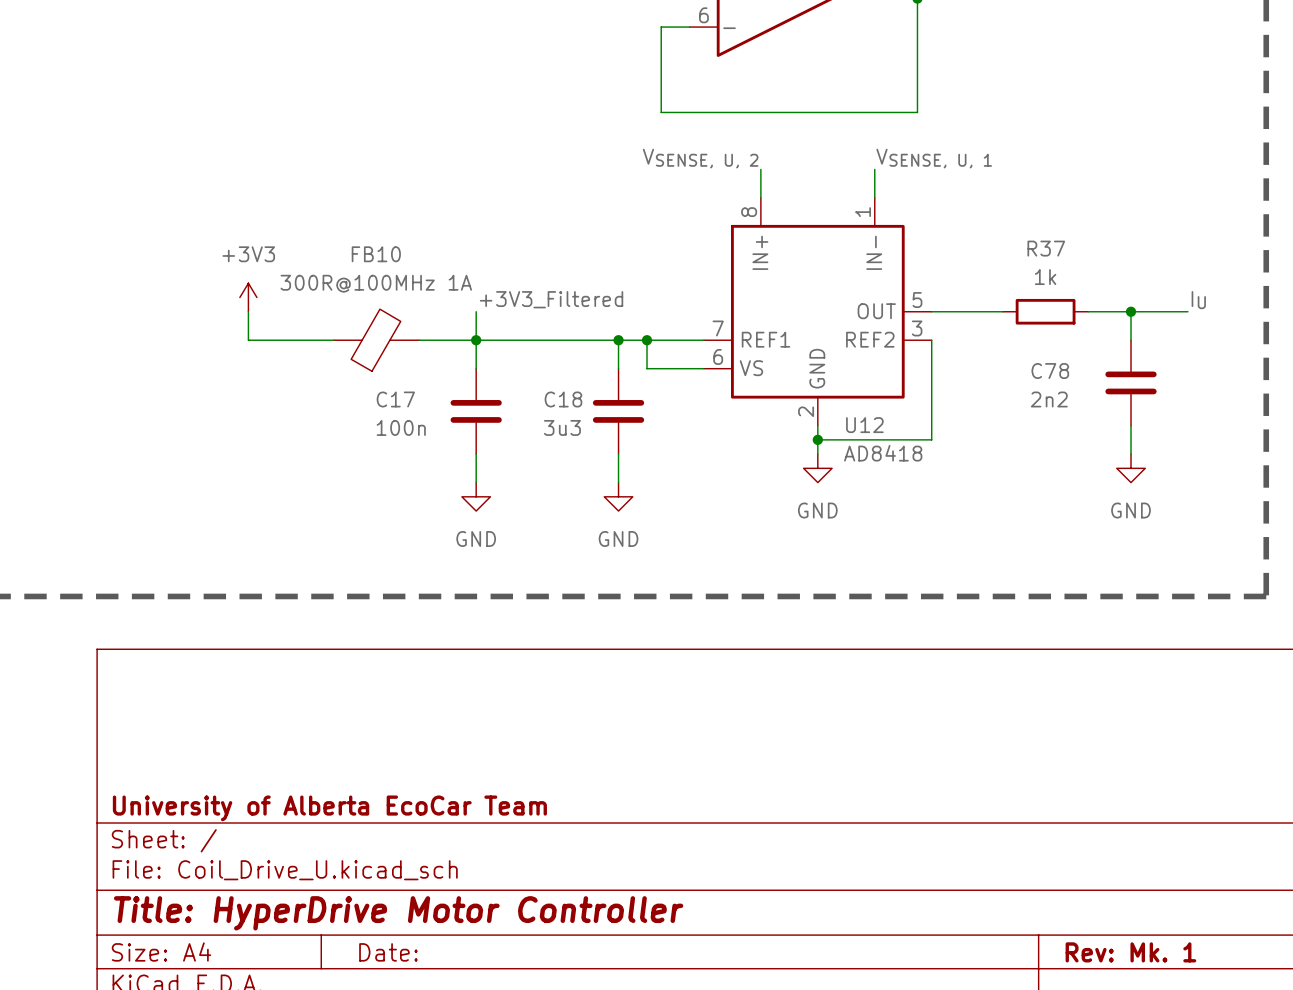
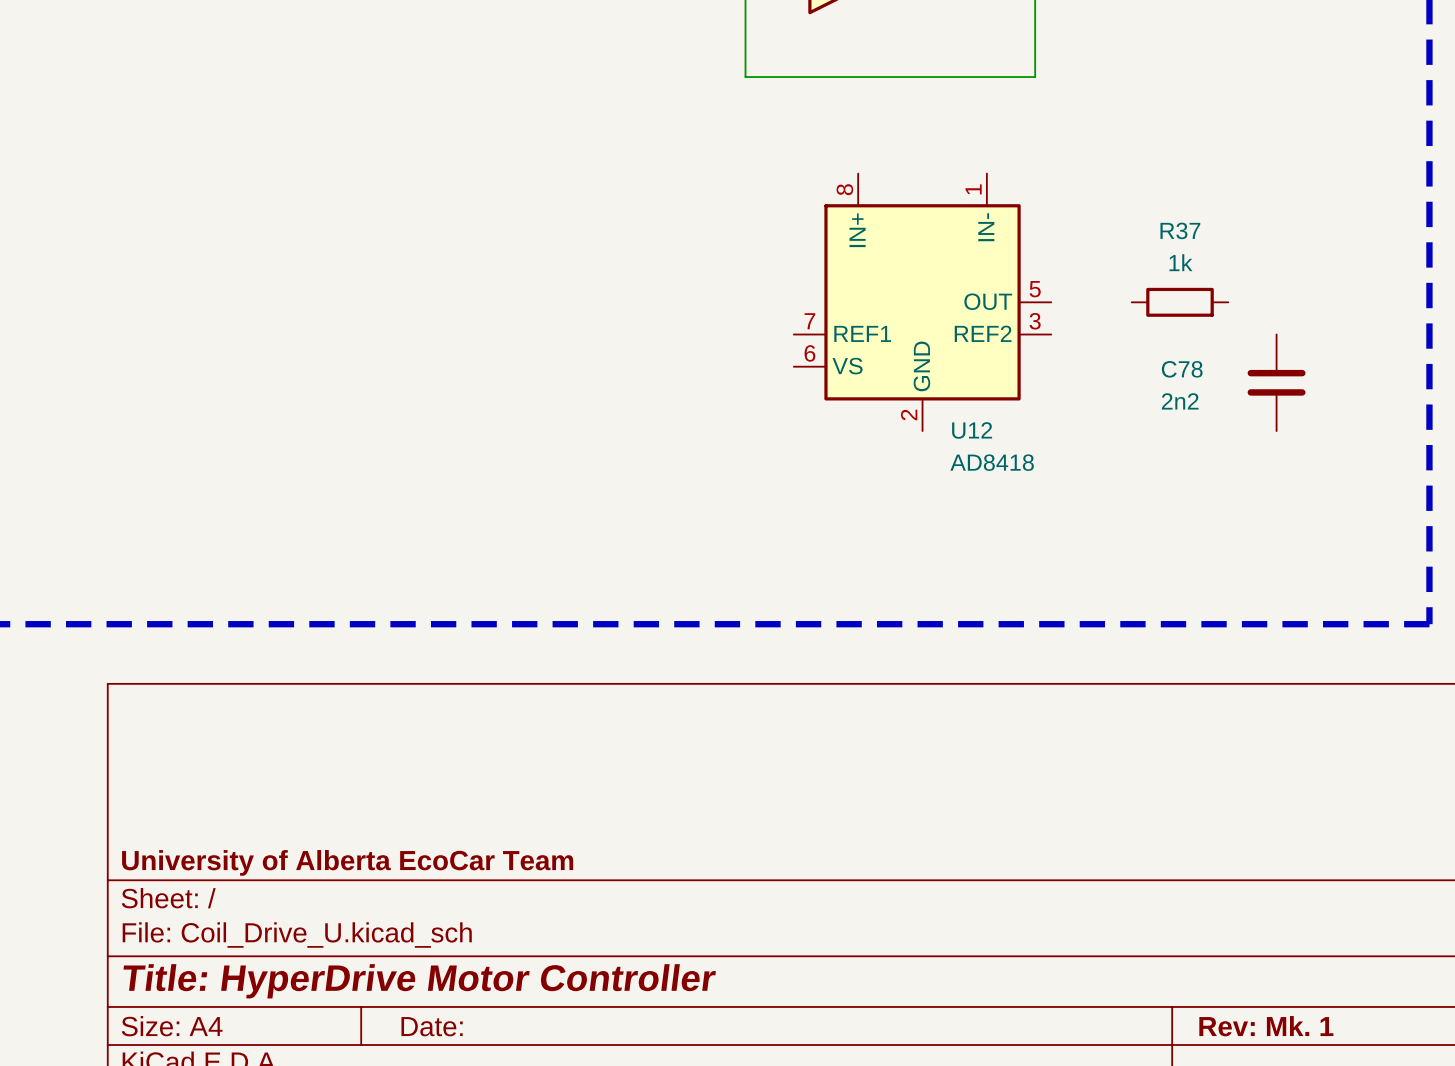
label: VSENSE, U, 2 (700, 158) -> none
label: VSENSE, U, 1 (934, 158) -> none
wire: (760, 169) (760, 197) -> none
wire: (874, 169) (874, 197) -> none
power symbol: +3V3 (248, 297) -> none
label: +3V3_Filtered (551, 299) -> none
label: IU (1198, 300) -> none
wire: (248, 311) (248, 340) (333, 340) -> none
wire: (476, 311) (476, 368) -> none
wire: (931, 311) (1002, 311) -> none
wire: (1088, 311) (1187, 311) -> none
wire: (1131, 311) (1131, 340) -> none
junction: (1131, 311) -> none
FB10: 300R@100MHz 1A (376, 340) -> none
wire: (419, 340) (703, 340) -> none
junction: (476, 340) -> none
wire: (618, 340) (618, 368) -> none
junction: (618, 340) -> none
wire: (647, 340) (647, 368) (703, 368) -> none
junction: (647, 340) -> none
wire: (931, 340) (931, 439) (817, 439) -> none
C17: 100n (476, 411) -> none
C18: 3u3 (618, 411) -> none
wire: (817, 425) (817, 454) -> none
wire: (1131, 425) (1131, 454) -> none
junction: (817, 439) -> none
wire: (476, 454) (476, 482) -> none
wire: (618, 454) (618, 482) -> none
power symbol: GND (817, 468) -> none
power symbol: GND (1131, 468) -> none
power symbol: GND (476, 496) -> none
power symbol: GND (618, 496) -> none

